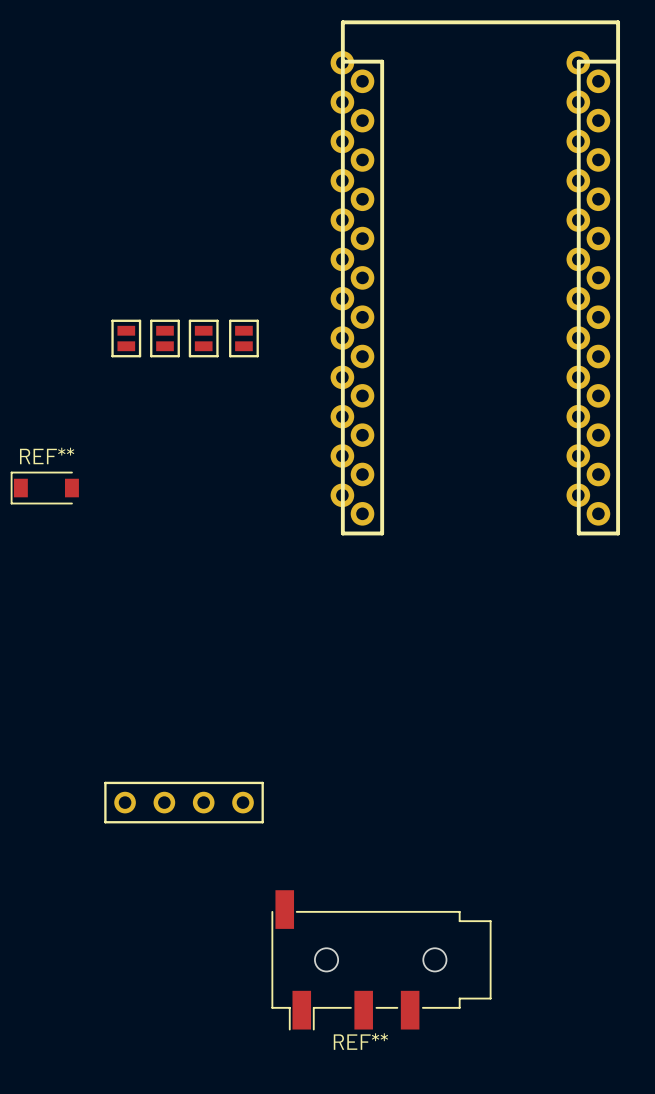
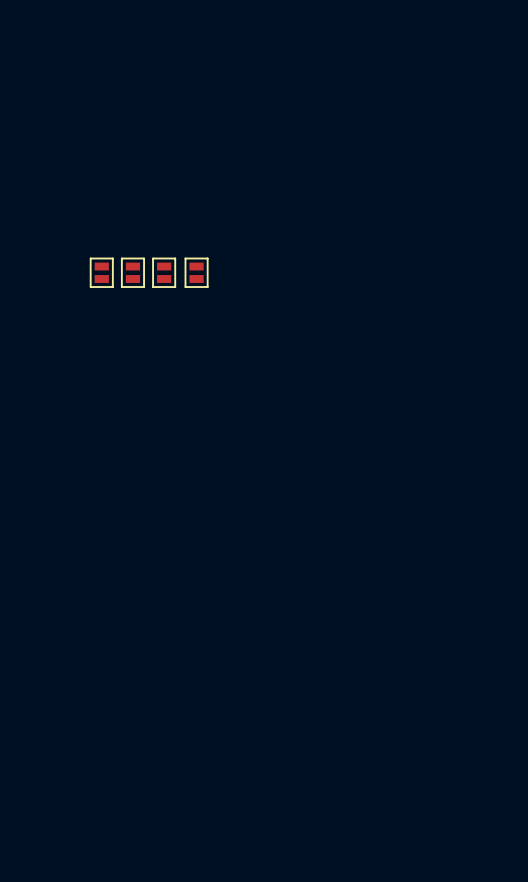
part: (475, 277) -> none
REF**: (44, 488) -> none
part: (184, 802) -> none
REF**: (381, 960) -> none

